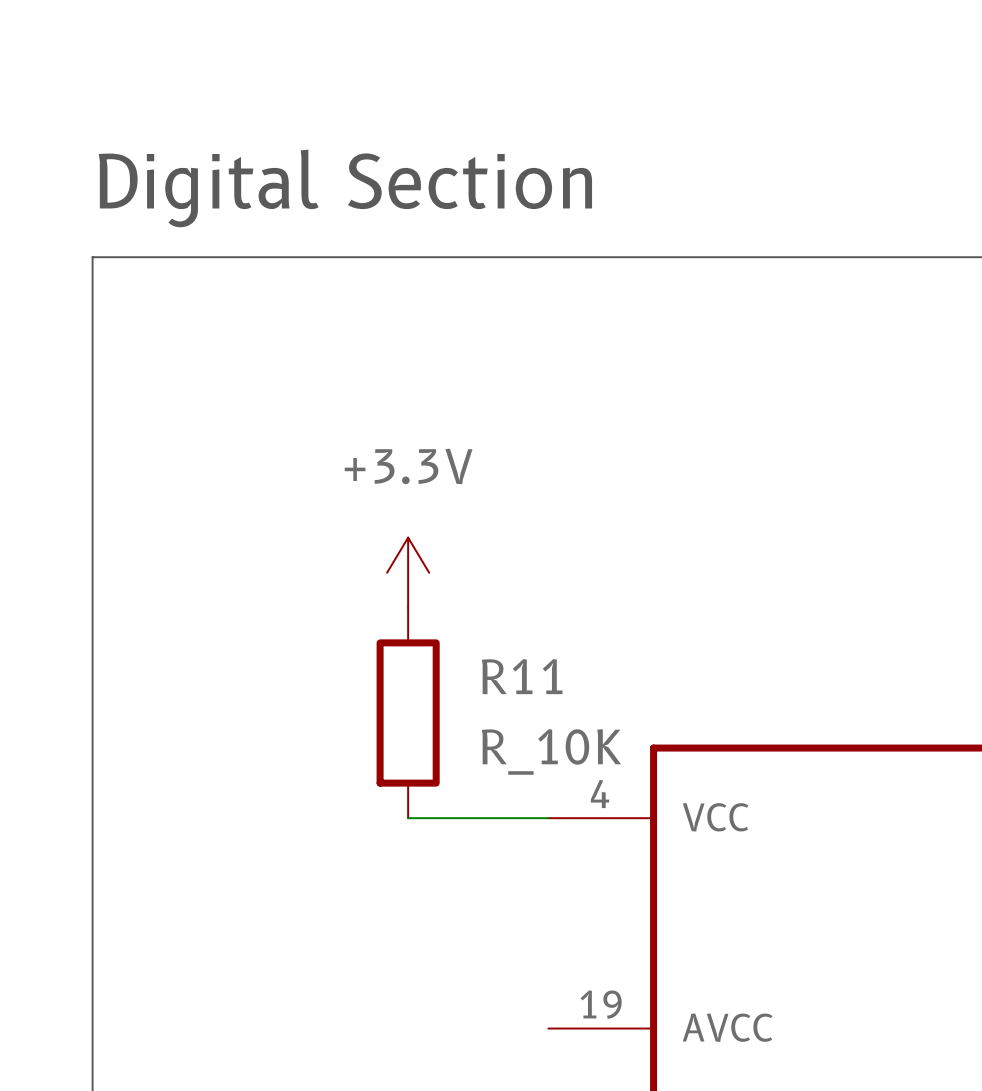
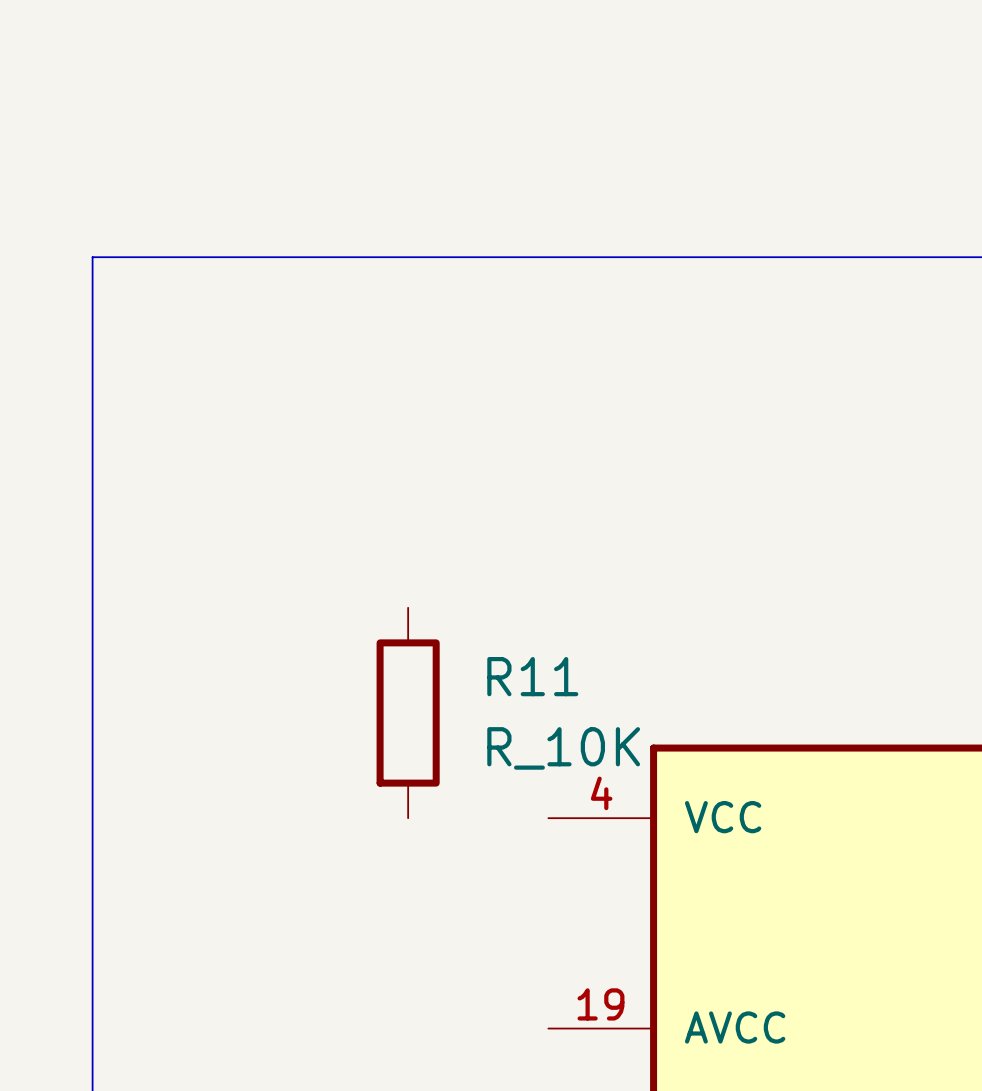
text: Digital Section (345, 188) -> none
power symbol: +3.3V (408, 572) -> none
wire: (408, 818) (548, 818) -> none

